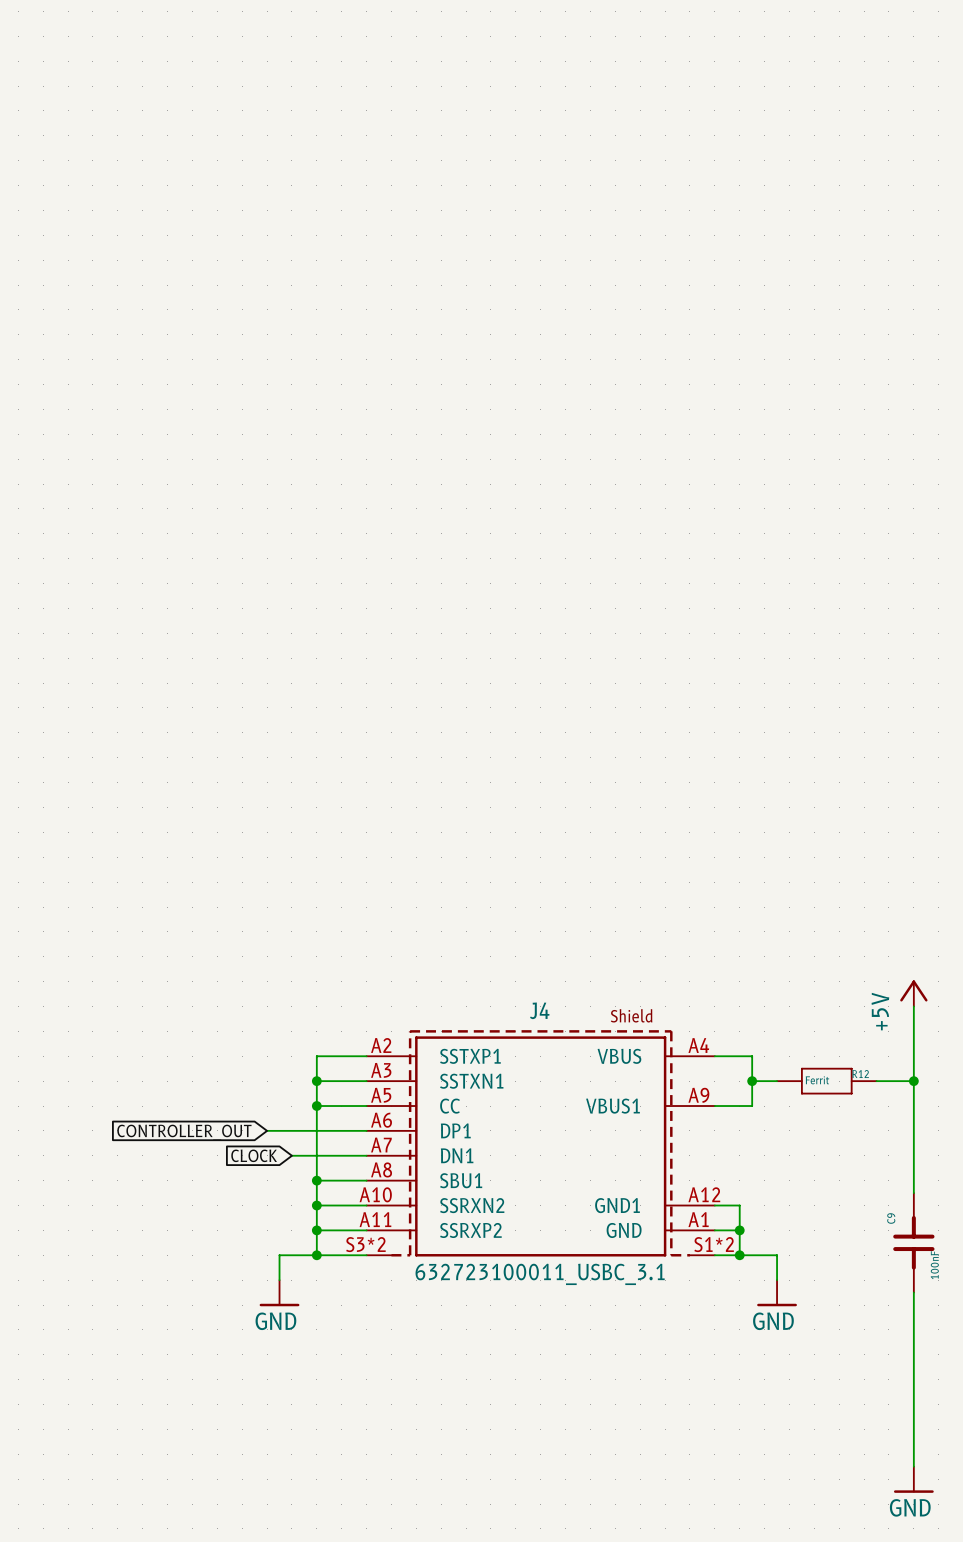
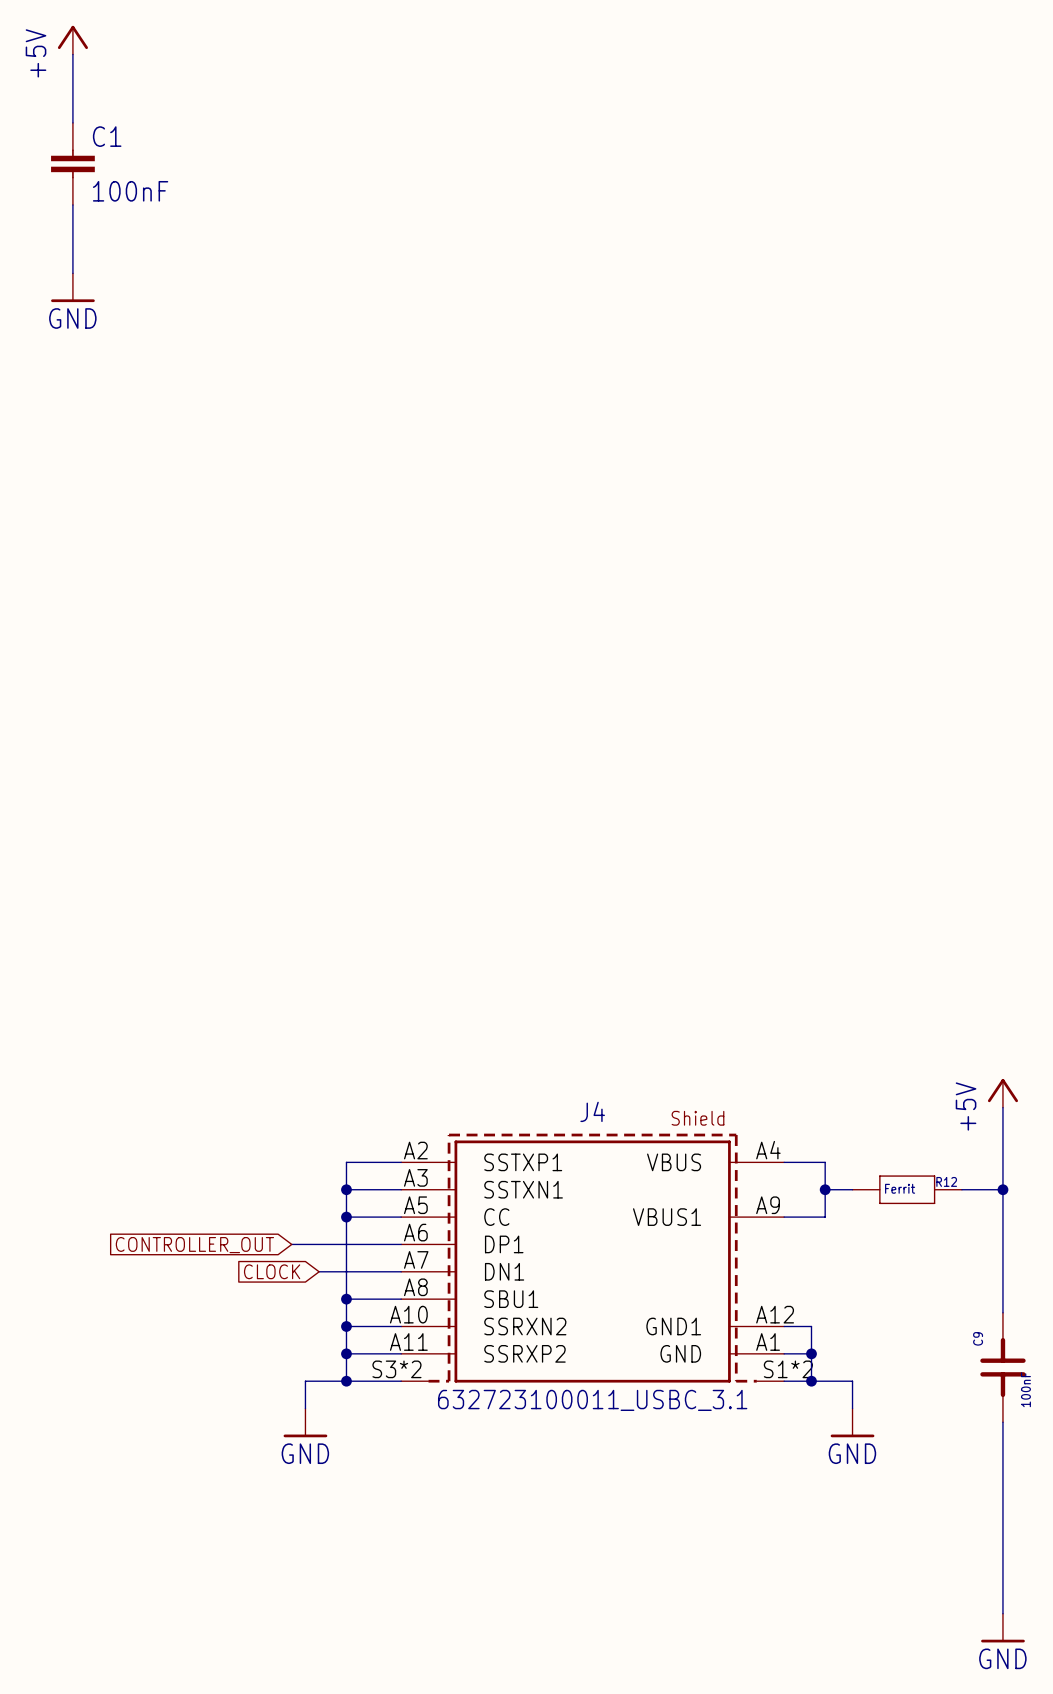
power symbol: none -> +5V (72, 40)
wire: none -> (72, 54) (72, 122)
C1: none -> 100nF (72, 163)
wire: none -> (72, 204) (72, 273)
power symbol: none -> GND (72, 287)

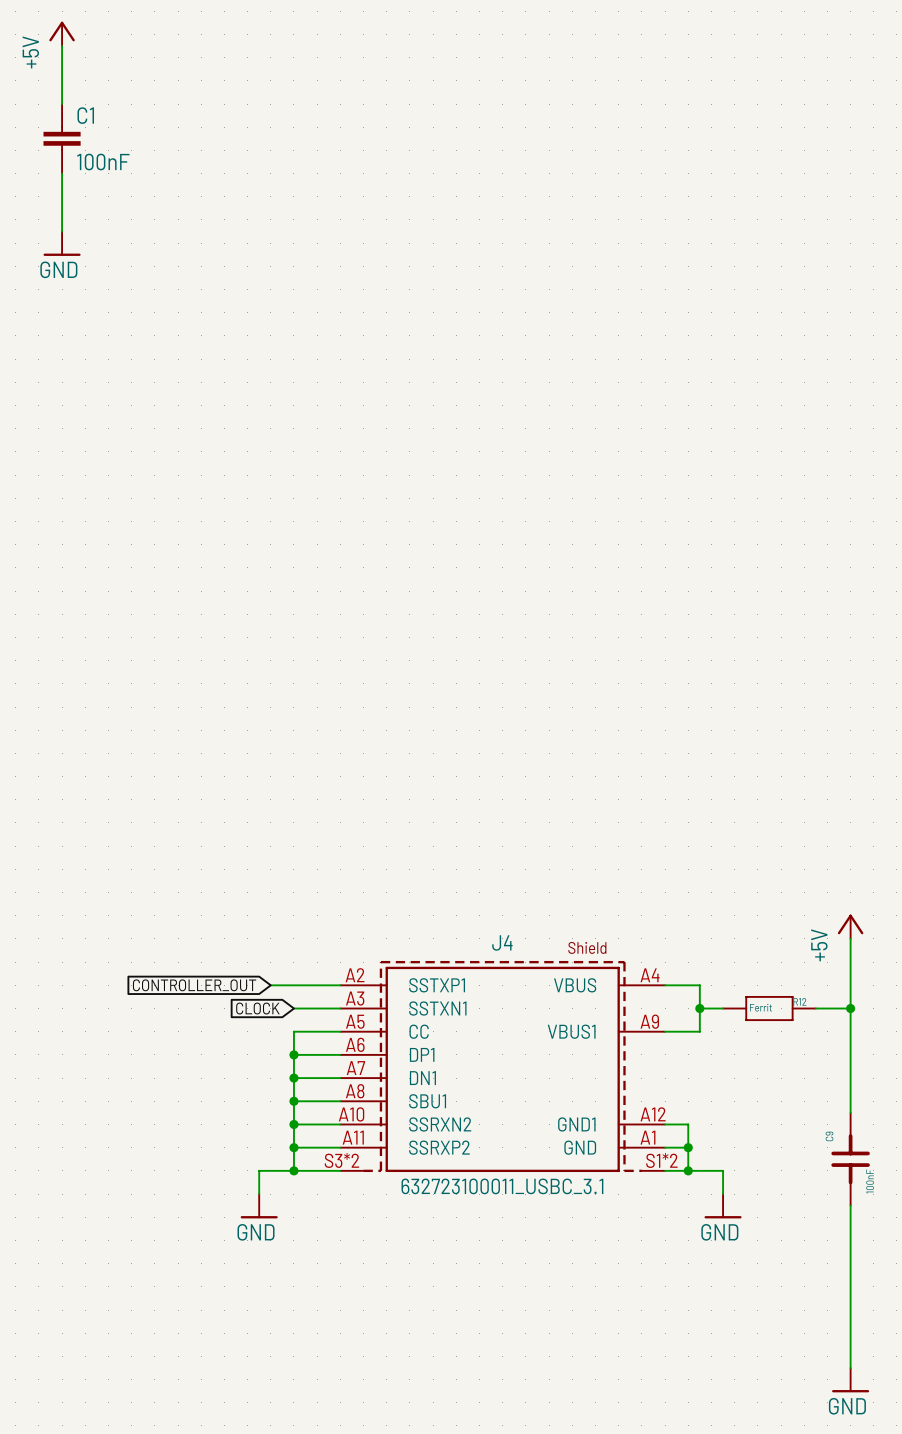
wire: (346, 1162) (346, 1217) -> (293, 985) (270, 985)
junction: (346, 1189) -> none
junction: (346, 1217) -> none
wire: (291, 1244) (346, 1244) -> none
junction: none -> (293, 1054)
global label position: CONTROLLER_OUT (194, 1245) -> CONTROLLER_OUT (194, 985)
global label position: CLOCK (272, 1271) -> CLOCK (257, 1008)
wire: (319, 1271) (346, 1271) -> none
junction: none -> (293, 1078)

